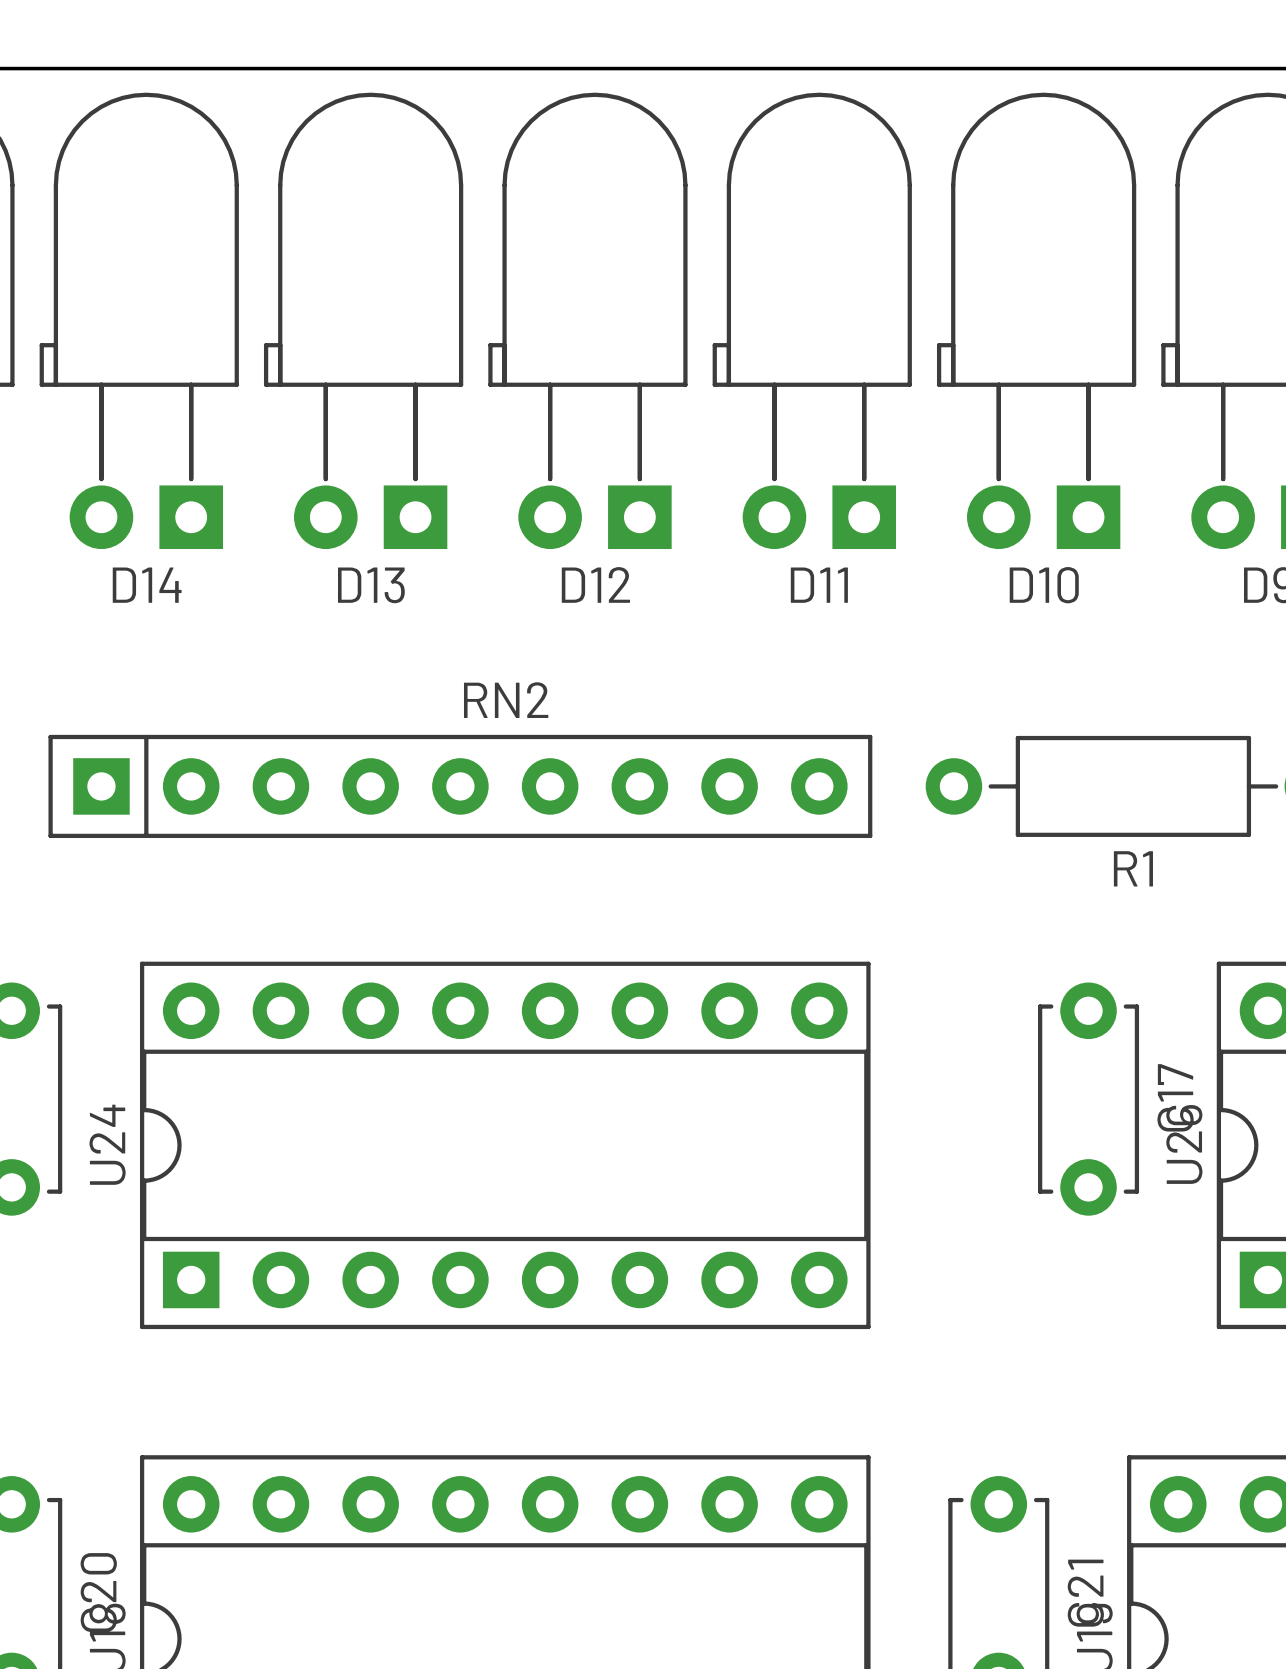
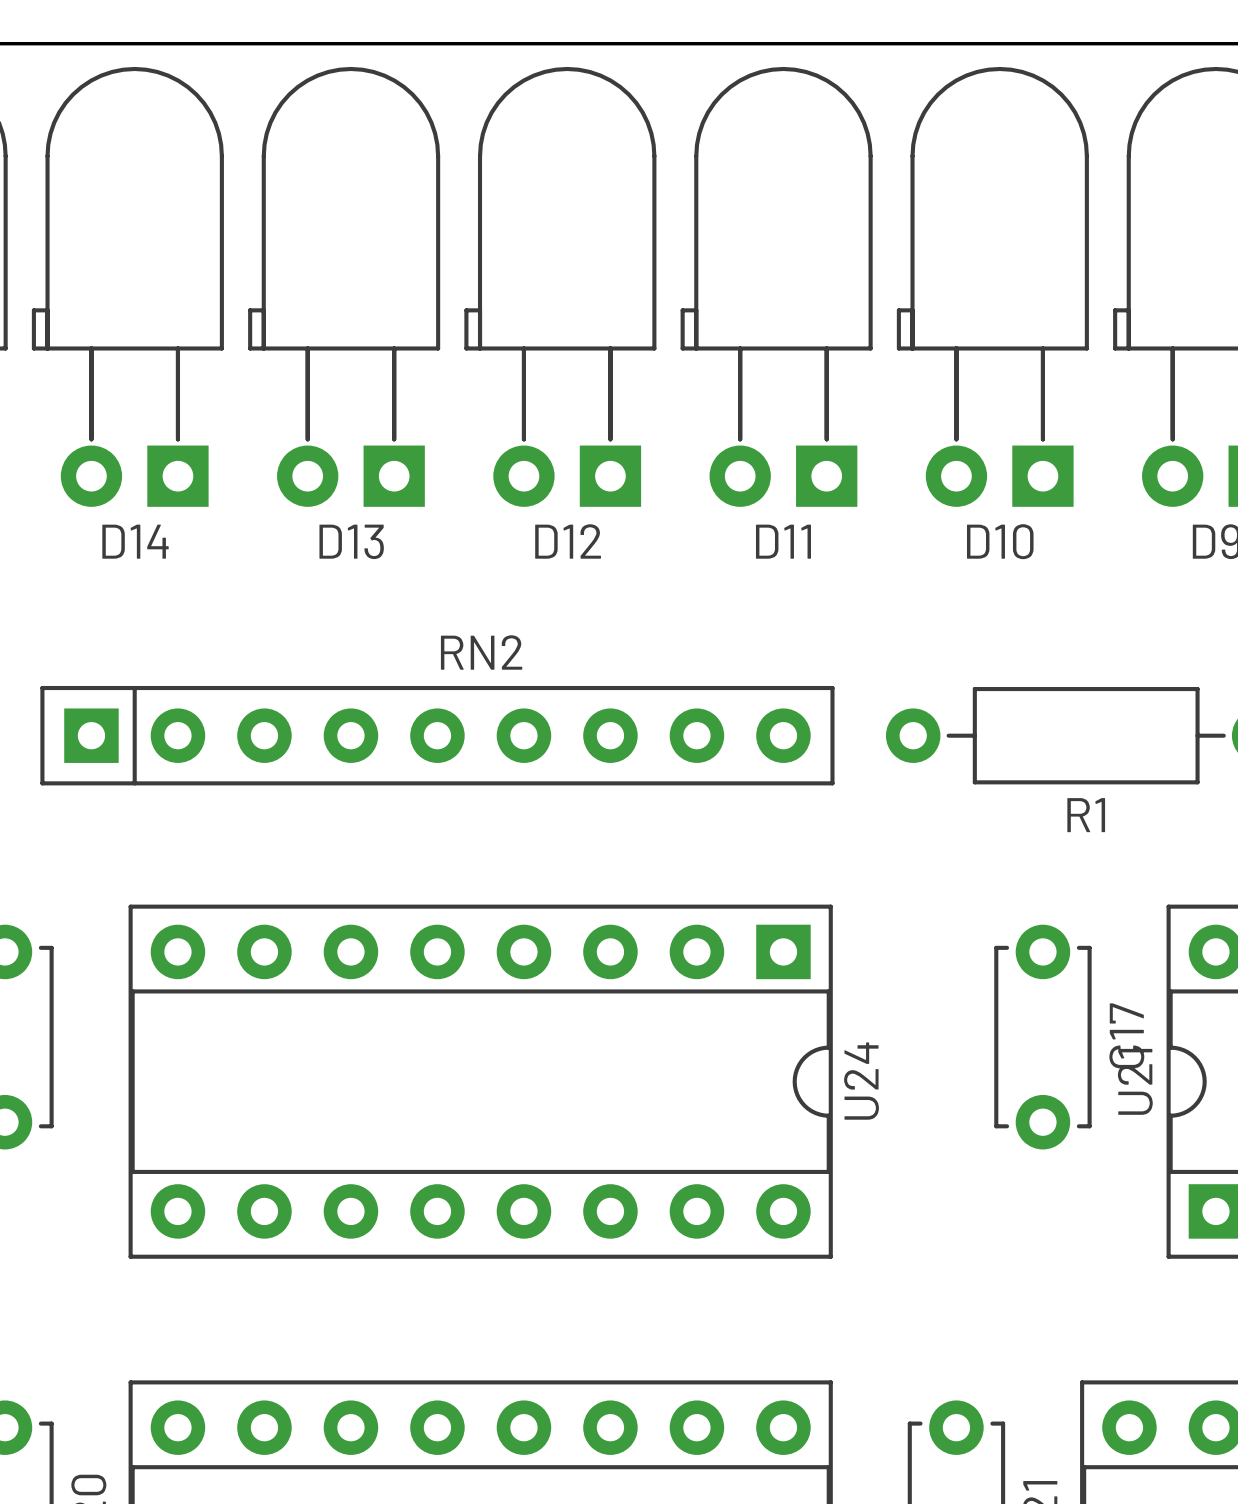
U26 name: U26 (1184, 1144) -> U21 (1135, 1081)
U24 rotation: 0° (505, 1145) -> 180° (480, 1081)

